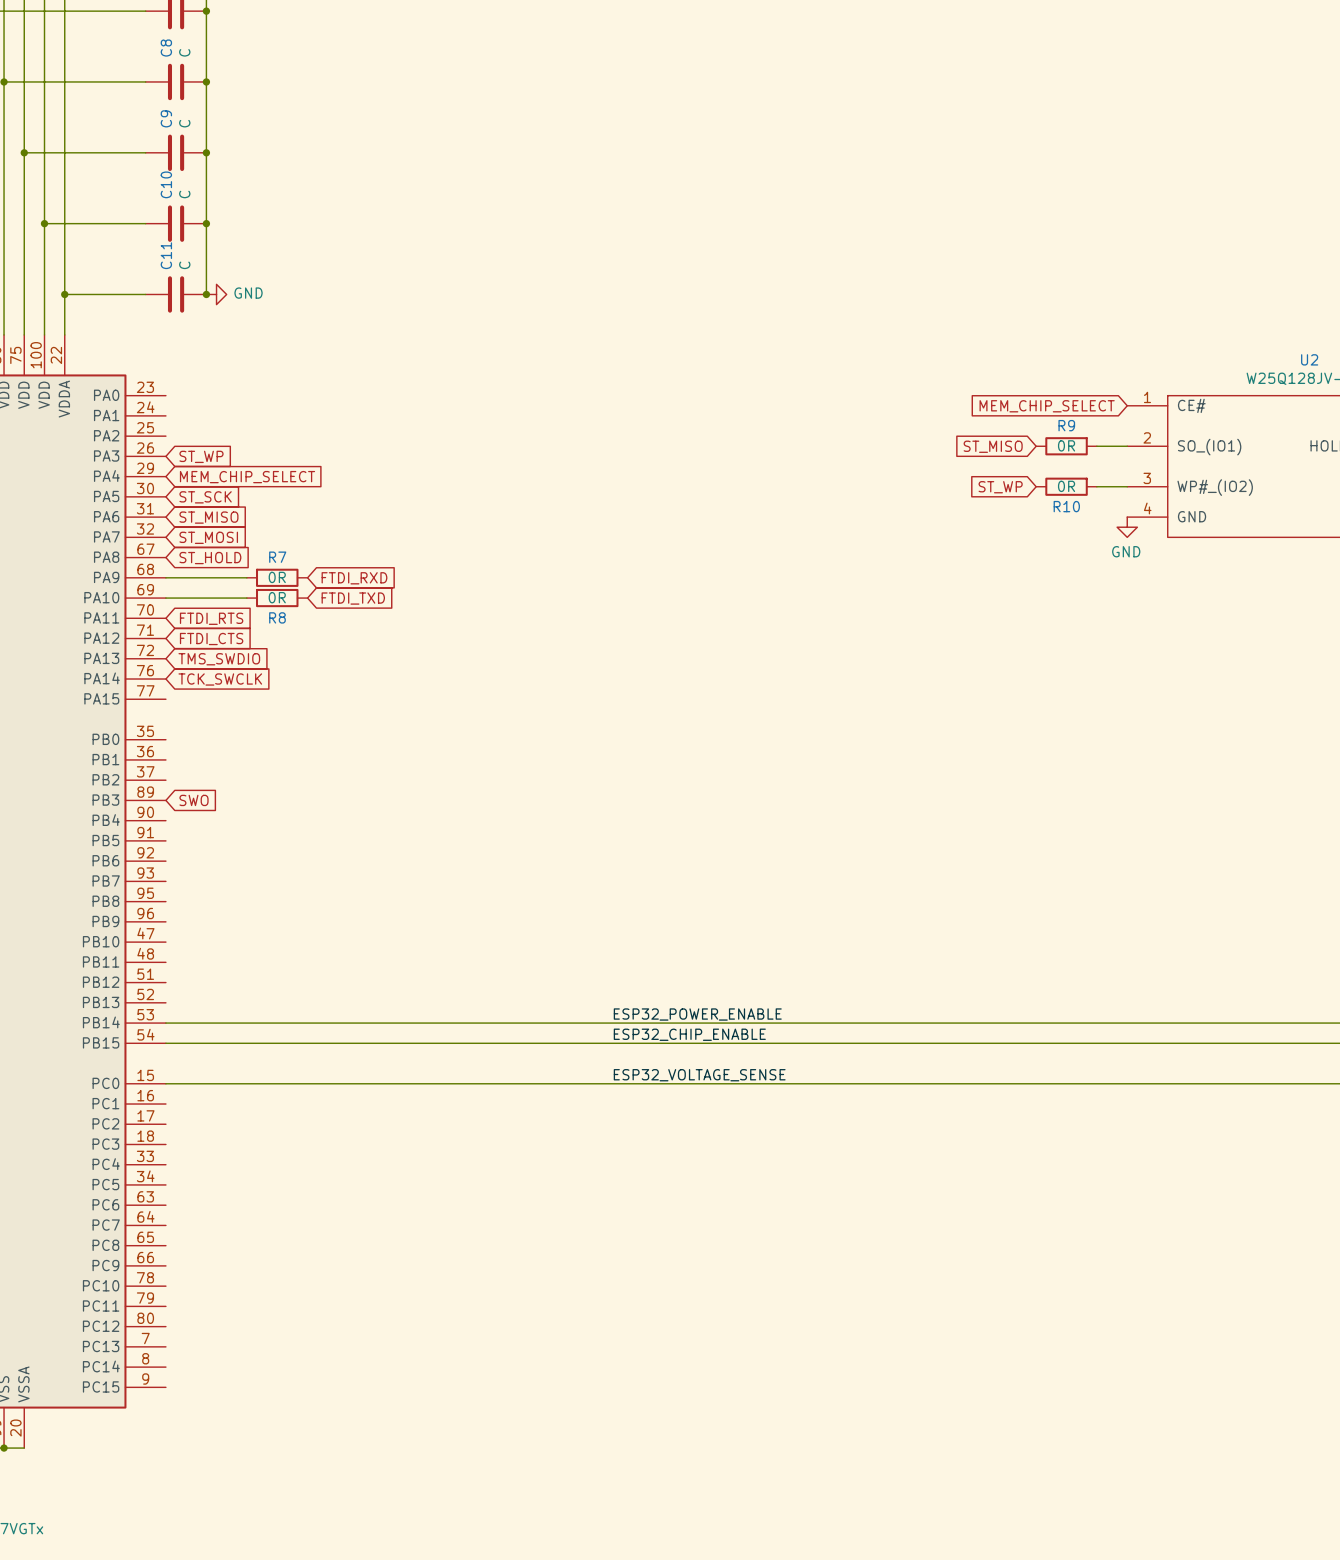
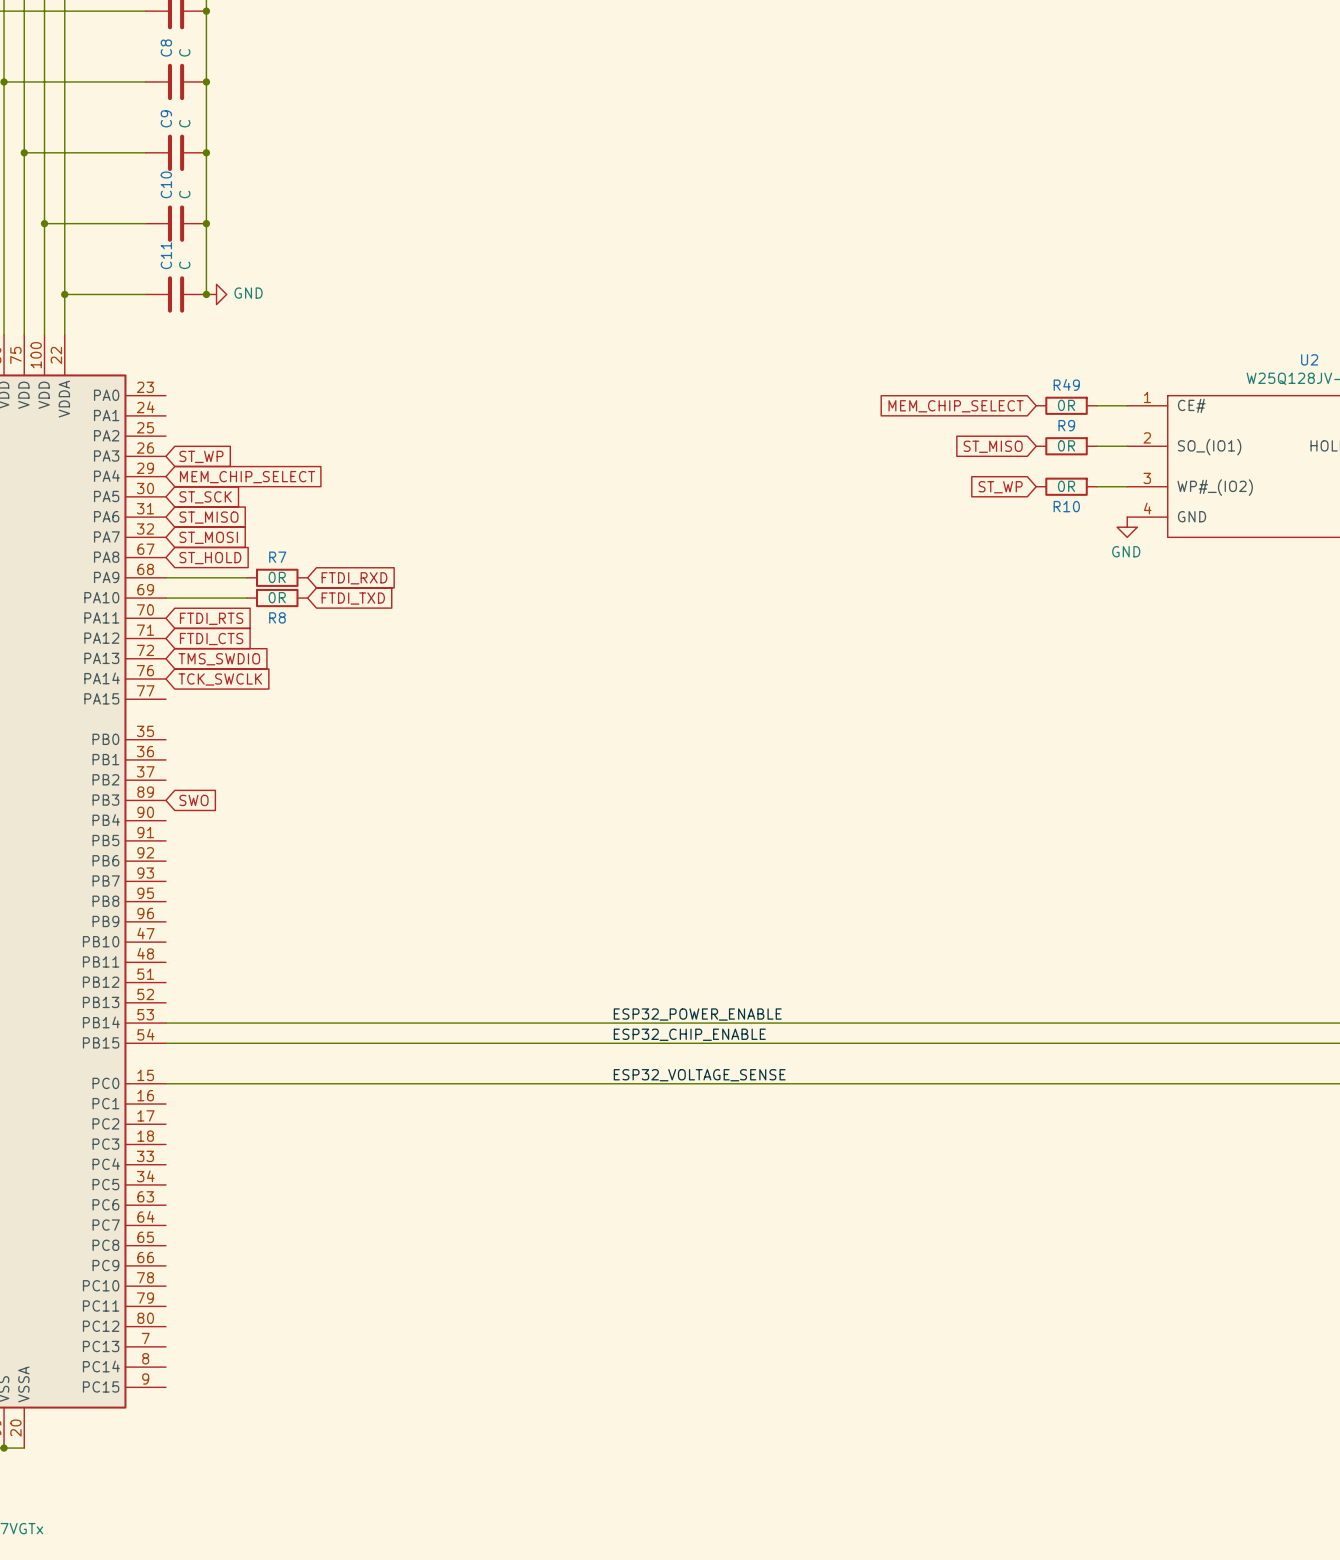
R49: none -> 0R (1066, 405)
wire: none -> (1096, 405) (1127, 405)
global label position: MEM_CHIP_SELECT (1047, 406) -> MEM_CHIP_SELECT (956, 406)

